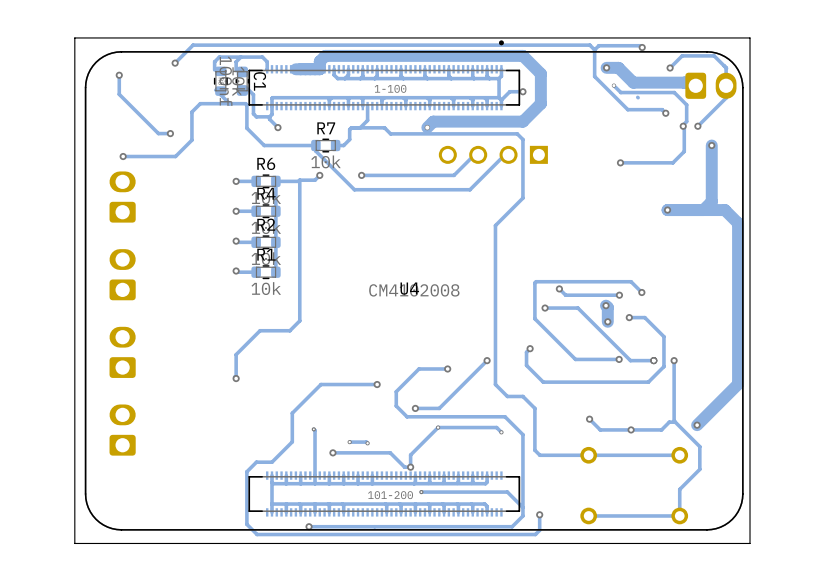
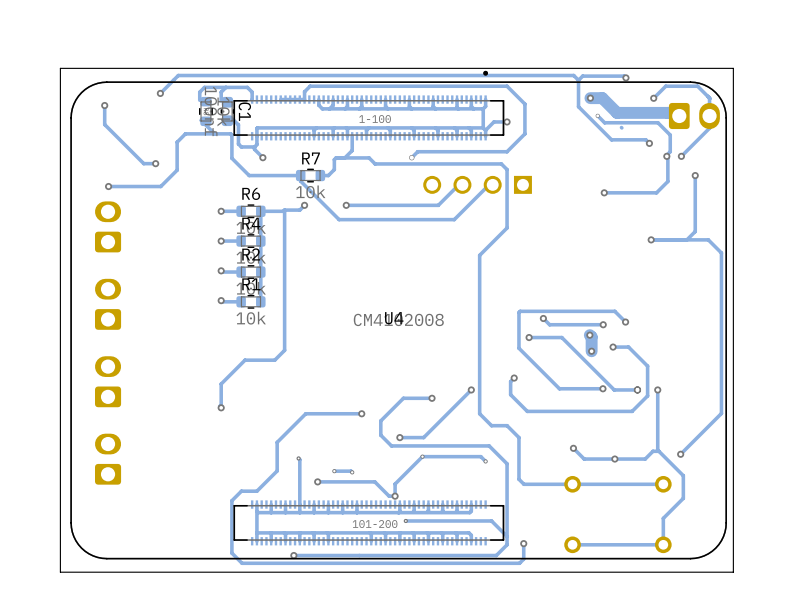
track width: thick (295, 69) (319, 69) (319, 61) (325, 55) (522, 55) (540, 73) (540, 103) (522, 121) (433, 121) (427, 127) -> thin (280, 99) (304, 99) (304, 91) (310, 86) (507, 86) (524, 104) (524, 133) (507, 151) (417, 151) (411, 157)
track width: thick (711, 145) (711, 201) (703, 210) -> thin (695, 175) (695, 231) (686, 239)
track width: thick (667, 210) (724, 210) (738, 223) (738, 384) (697, 425) -> thin (651, 239) (708, 239) (721, 252) (721, 413) (680, 454)

